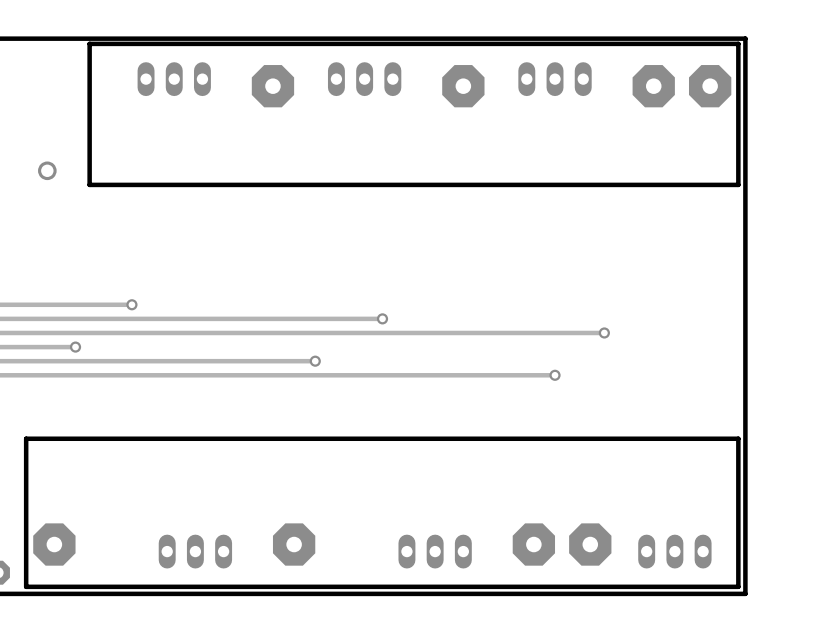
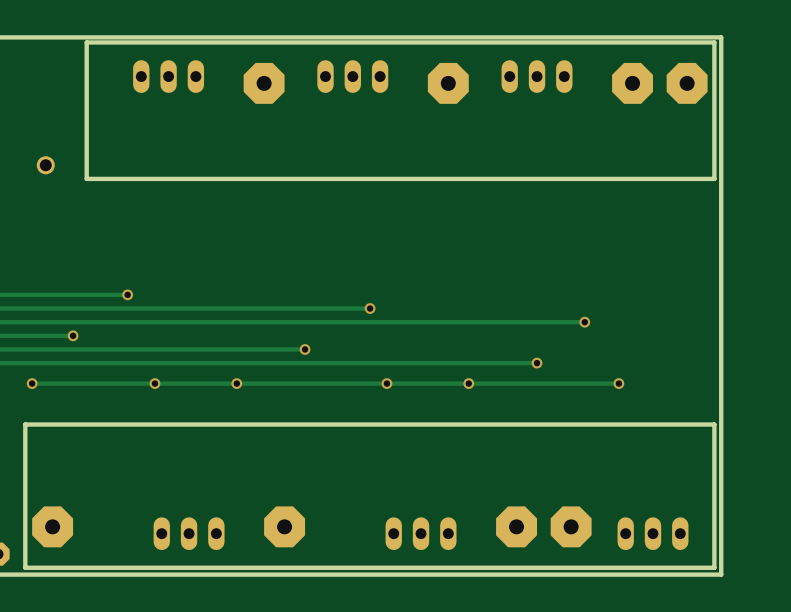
via: none -> (32, 383)
via: none -> (154, 383)
via: none -> (236, 383)
via: none -> (386, 383)
via: none -> (468, 383)
track: none -> (618, 383) (32, 383)
via: none -> (618, 383)

